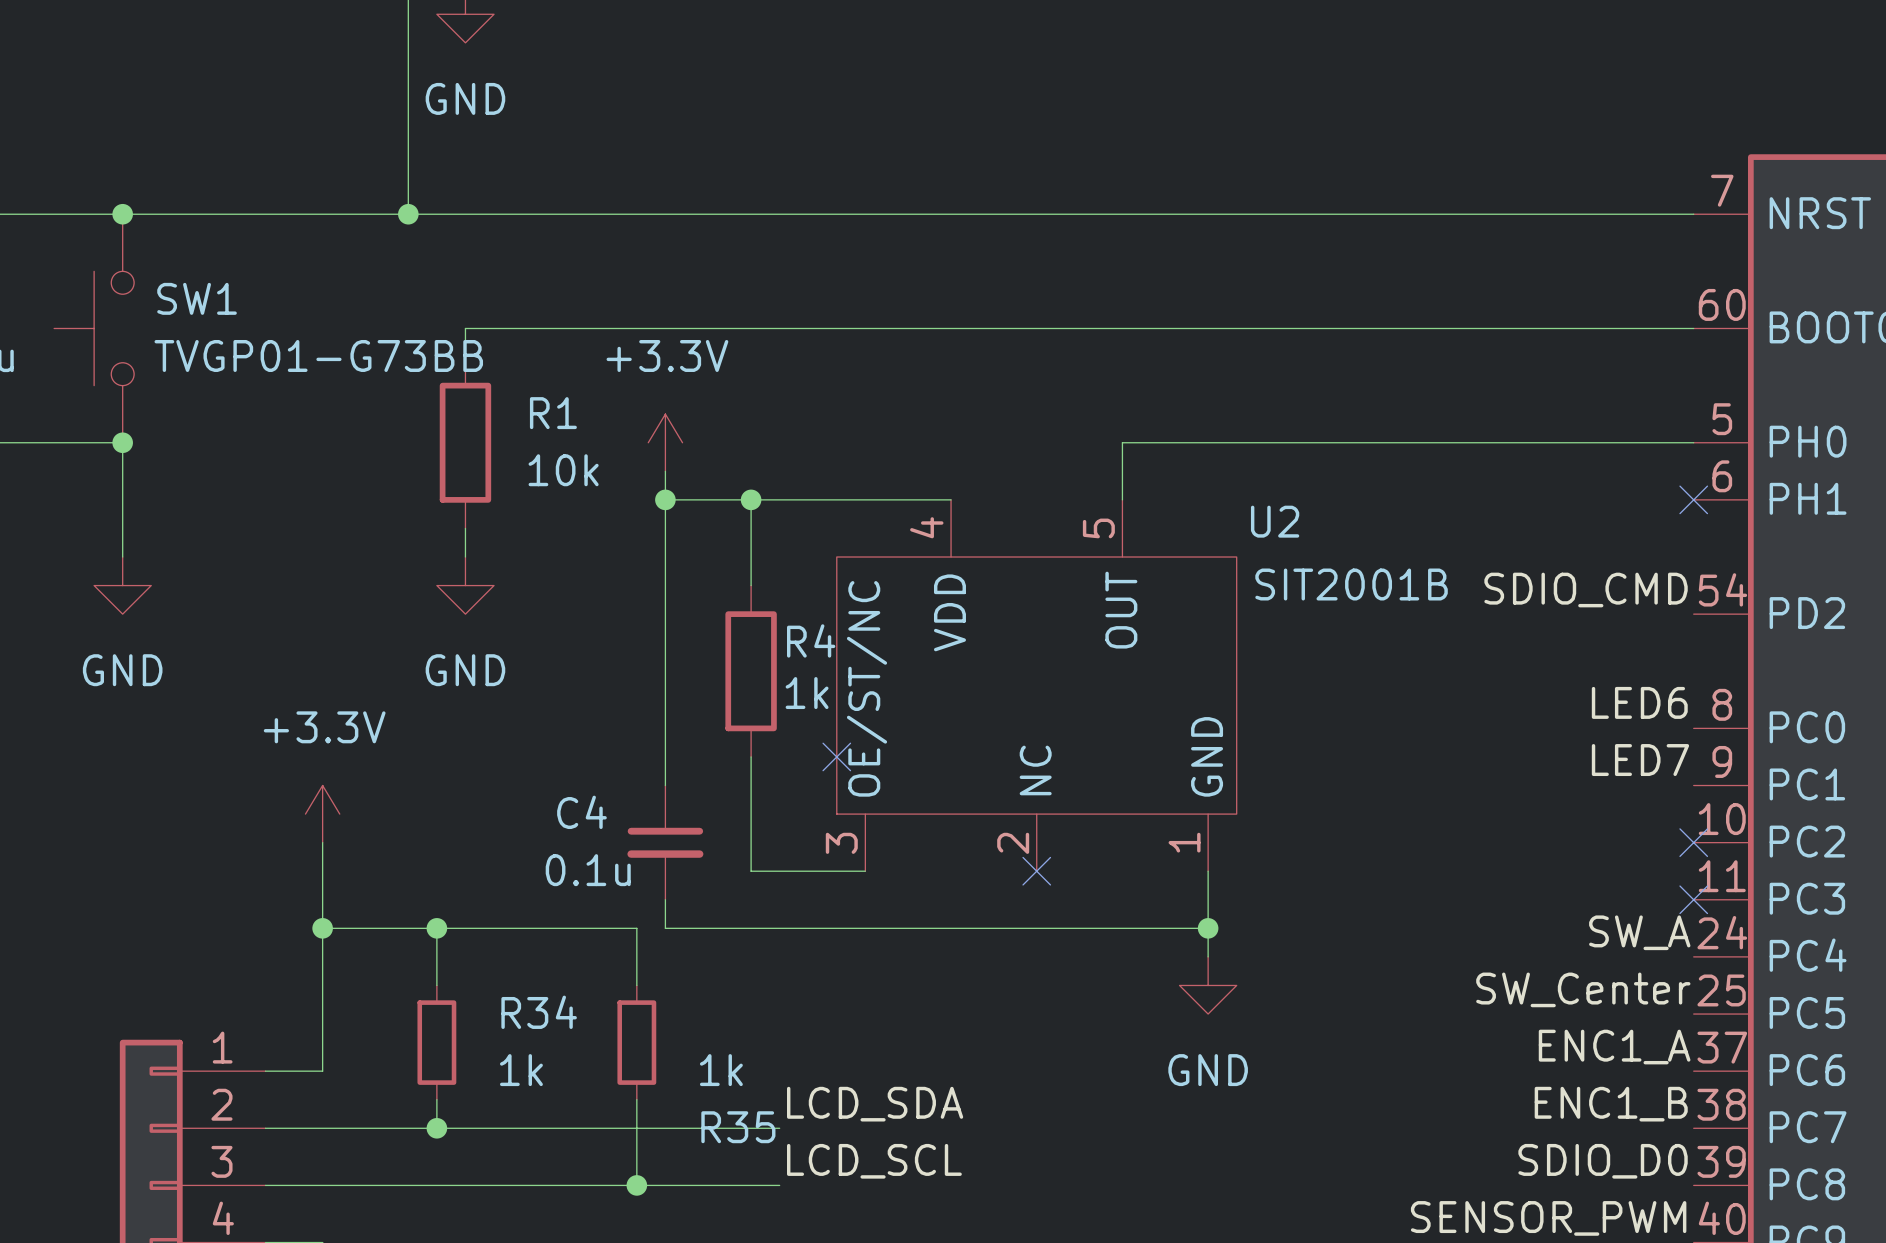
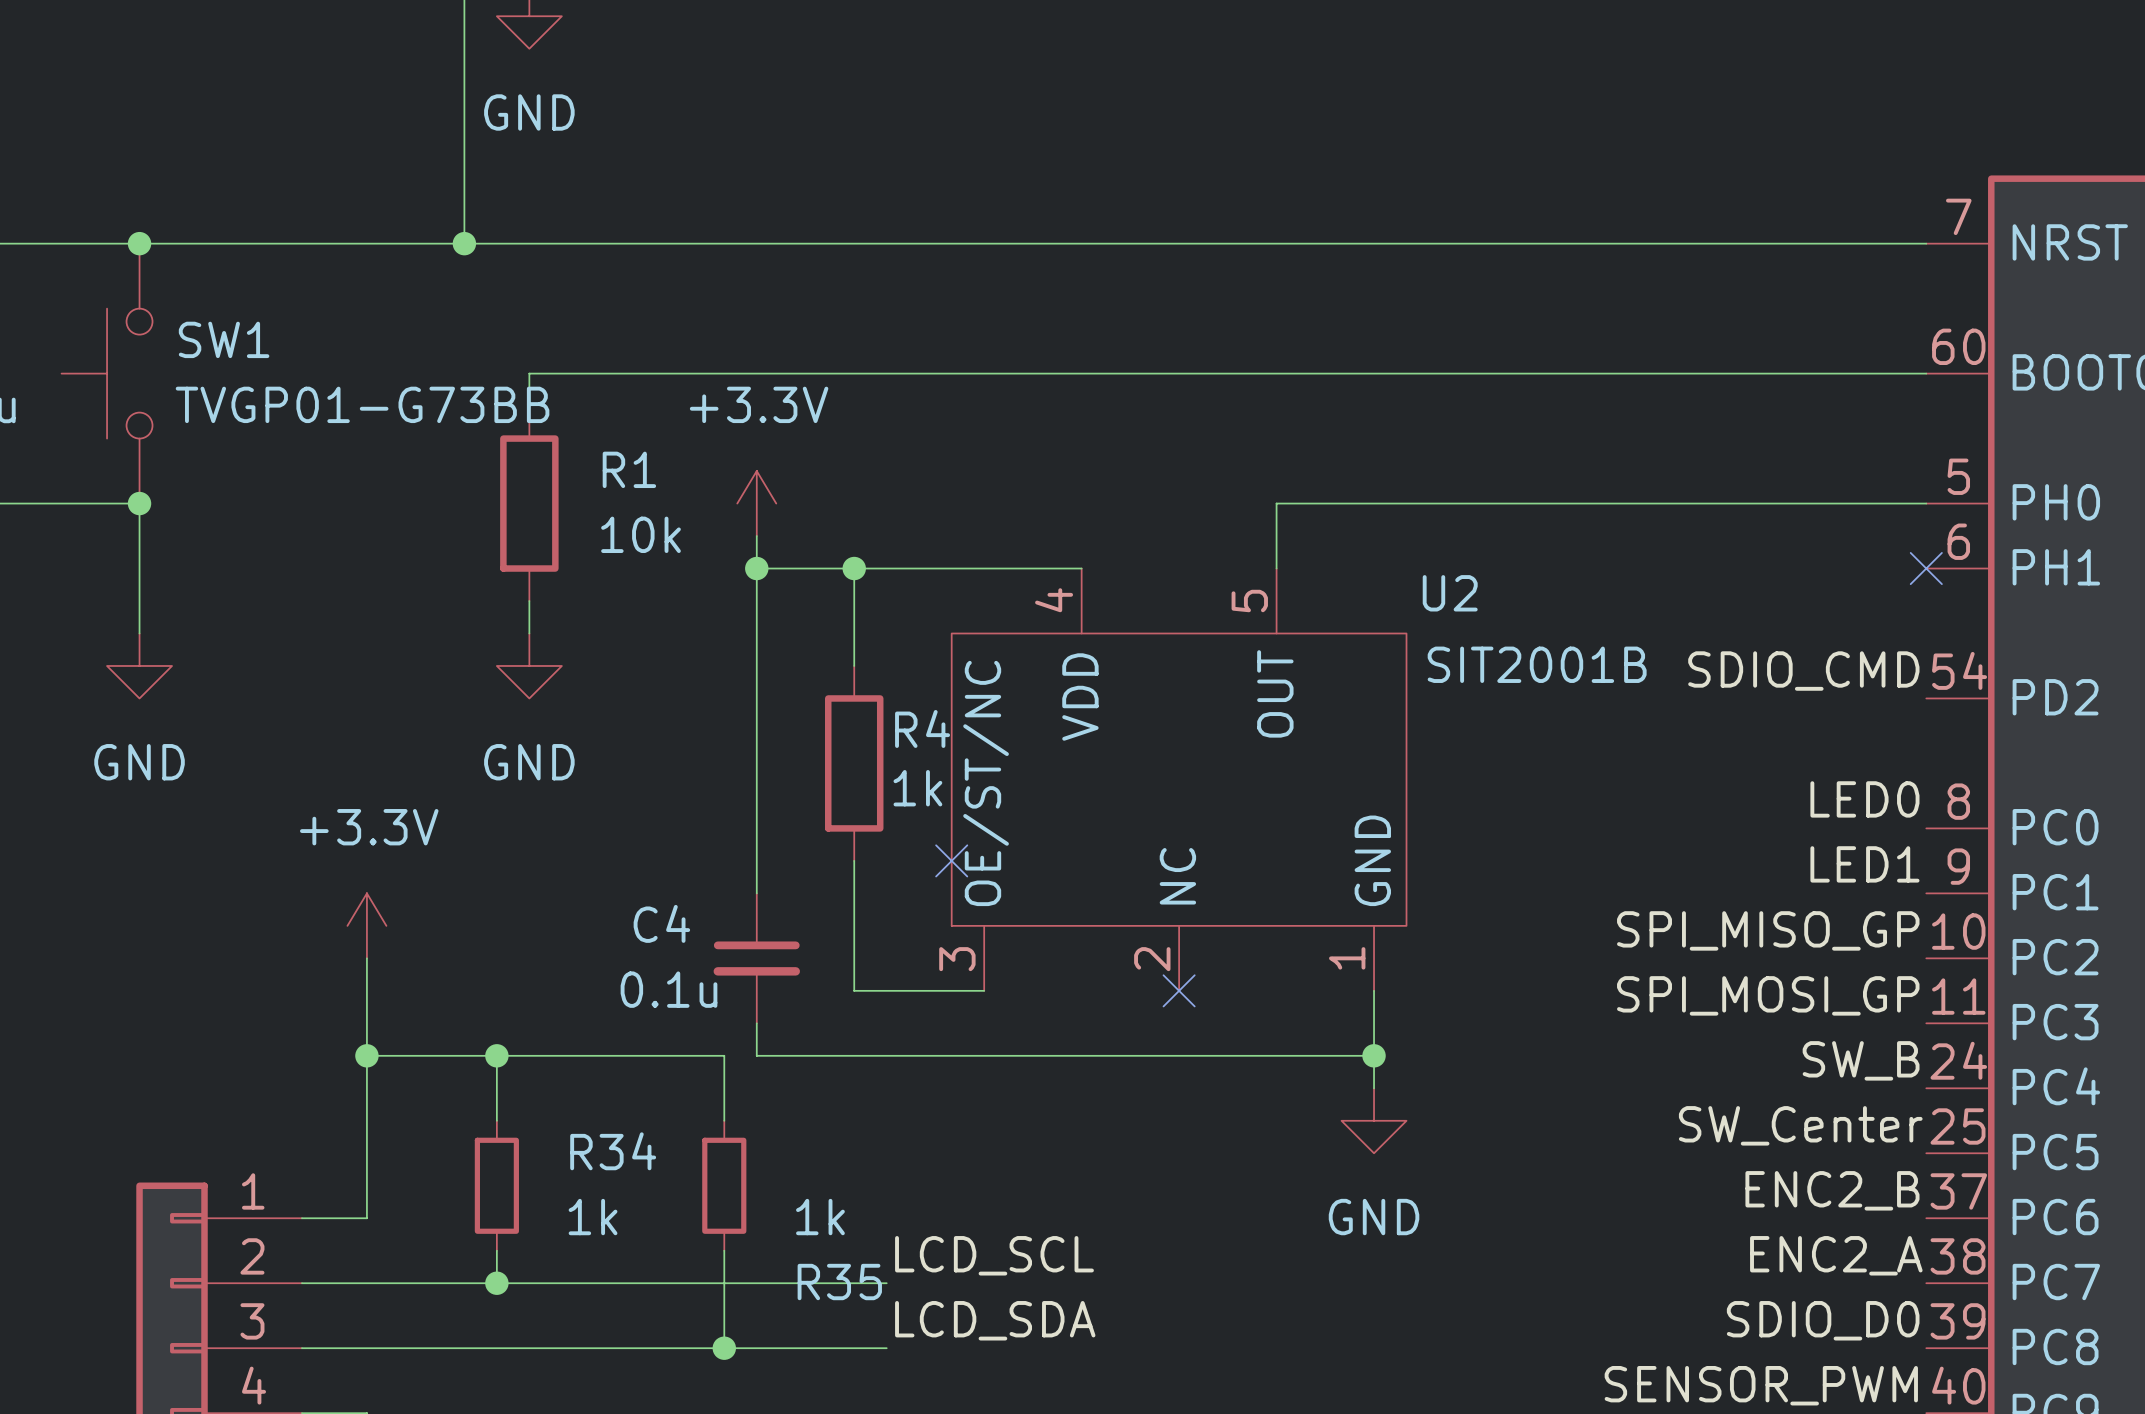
label: LED6 (1639, 702) -> LED0 (1864, 799)
label: LED7 (1640, 760) -> LED1 (1864, 864)
label: none -> SPI_MISO_GP (1768, 930)
no-connect mark: (1693, 842) -> none
label: none -> SPI_MOSI_GP (1768, 995)
no-connect mark: (1693, 899) -> none
label: SW_A (1639, 932) -> SW_B (1861, 1060)
label: ENC1_A (1614, 1047) -> ENC2_B (1832, 1190)
label: LCD_SDA (875, 1104) -> LCD_SCL (994, 1255)
label: ENC1_B (1611, 1104) -> ENC2_A (1836, 1255)
label: LCD_SCL (874, 1161) -> LCD_SDA (995, 1320)

